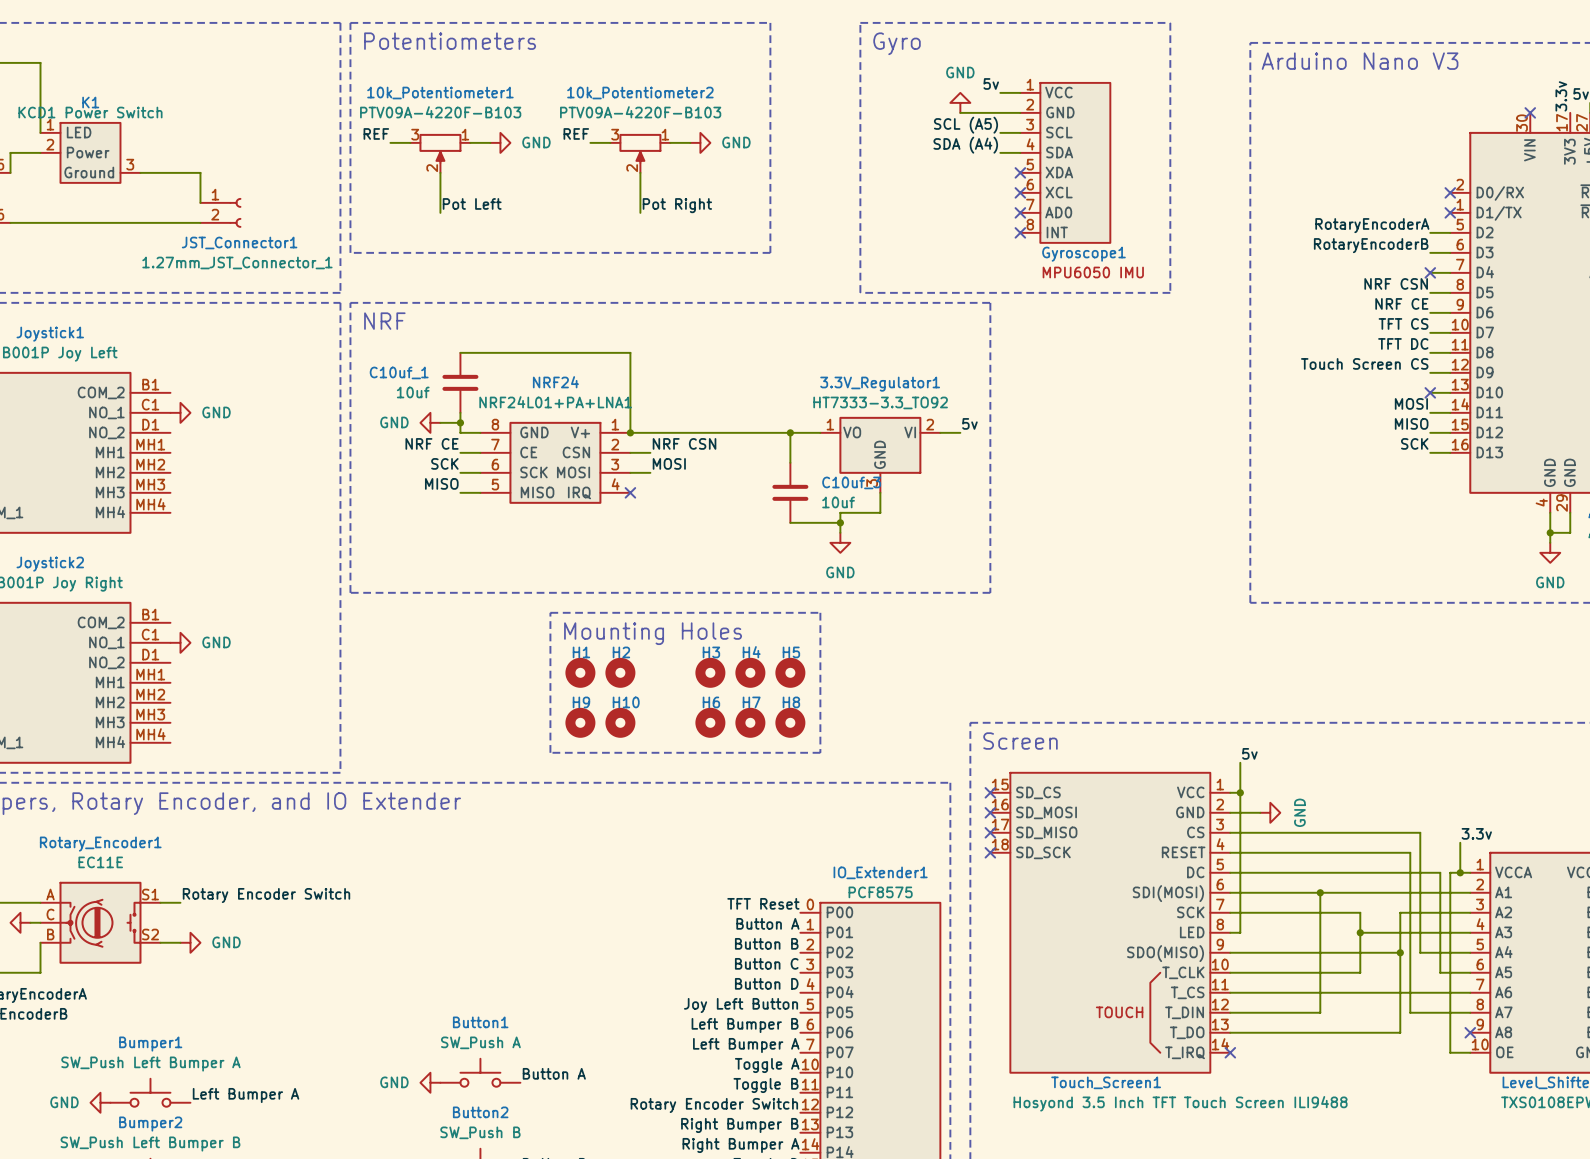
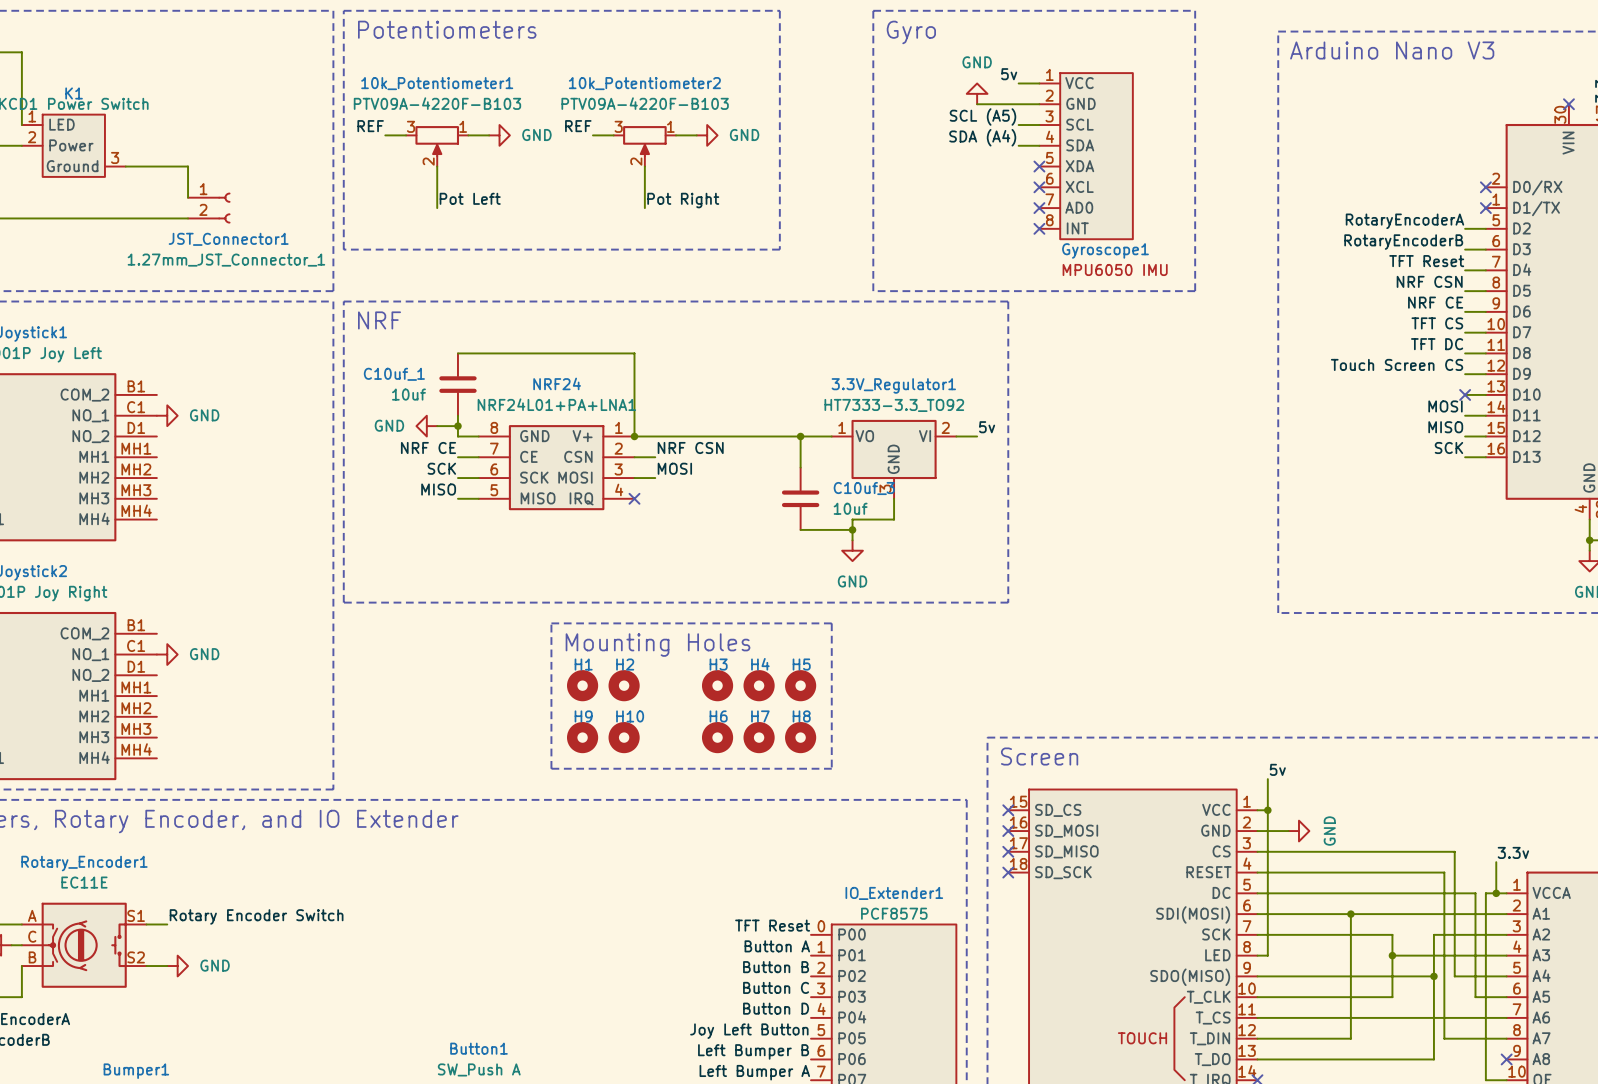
label: none -> TFT Reset (1426, 261)
no-connect mark: (1430, 272) -> none

